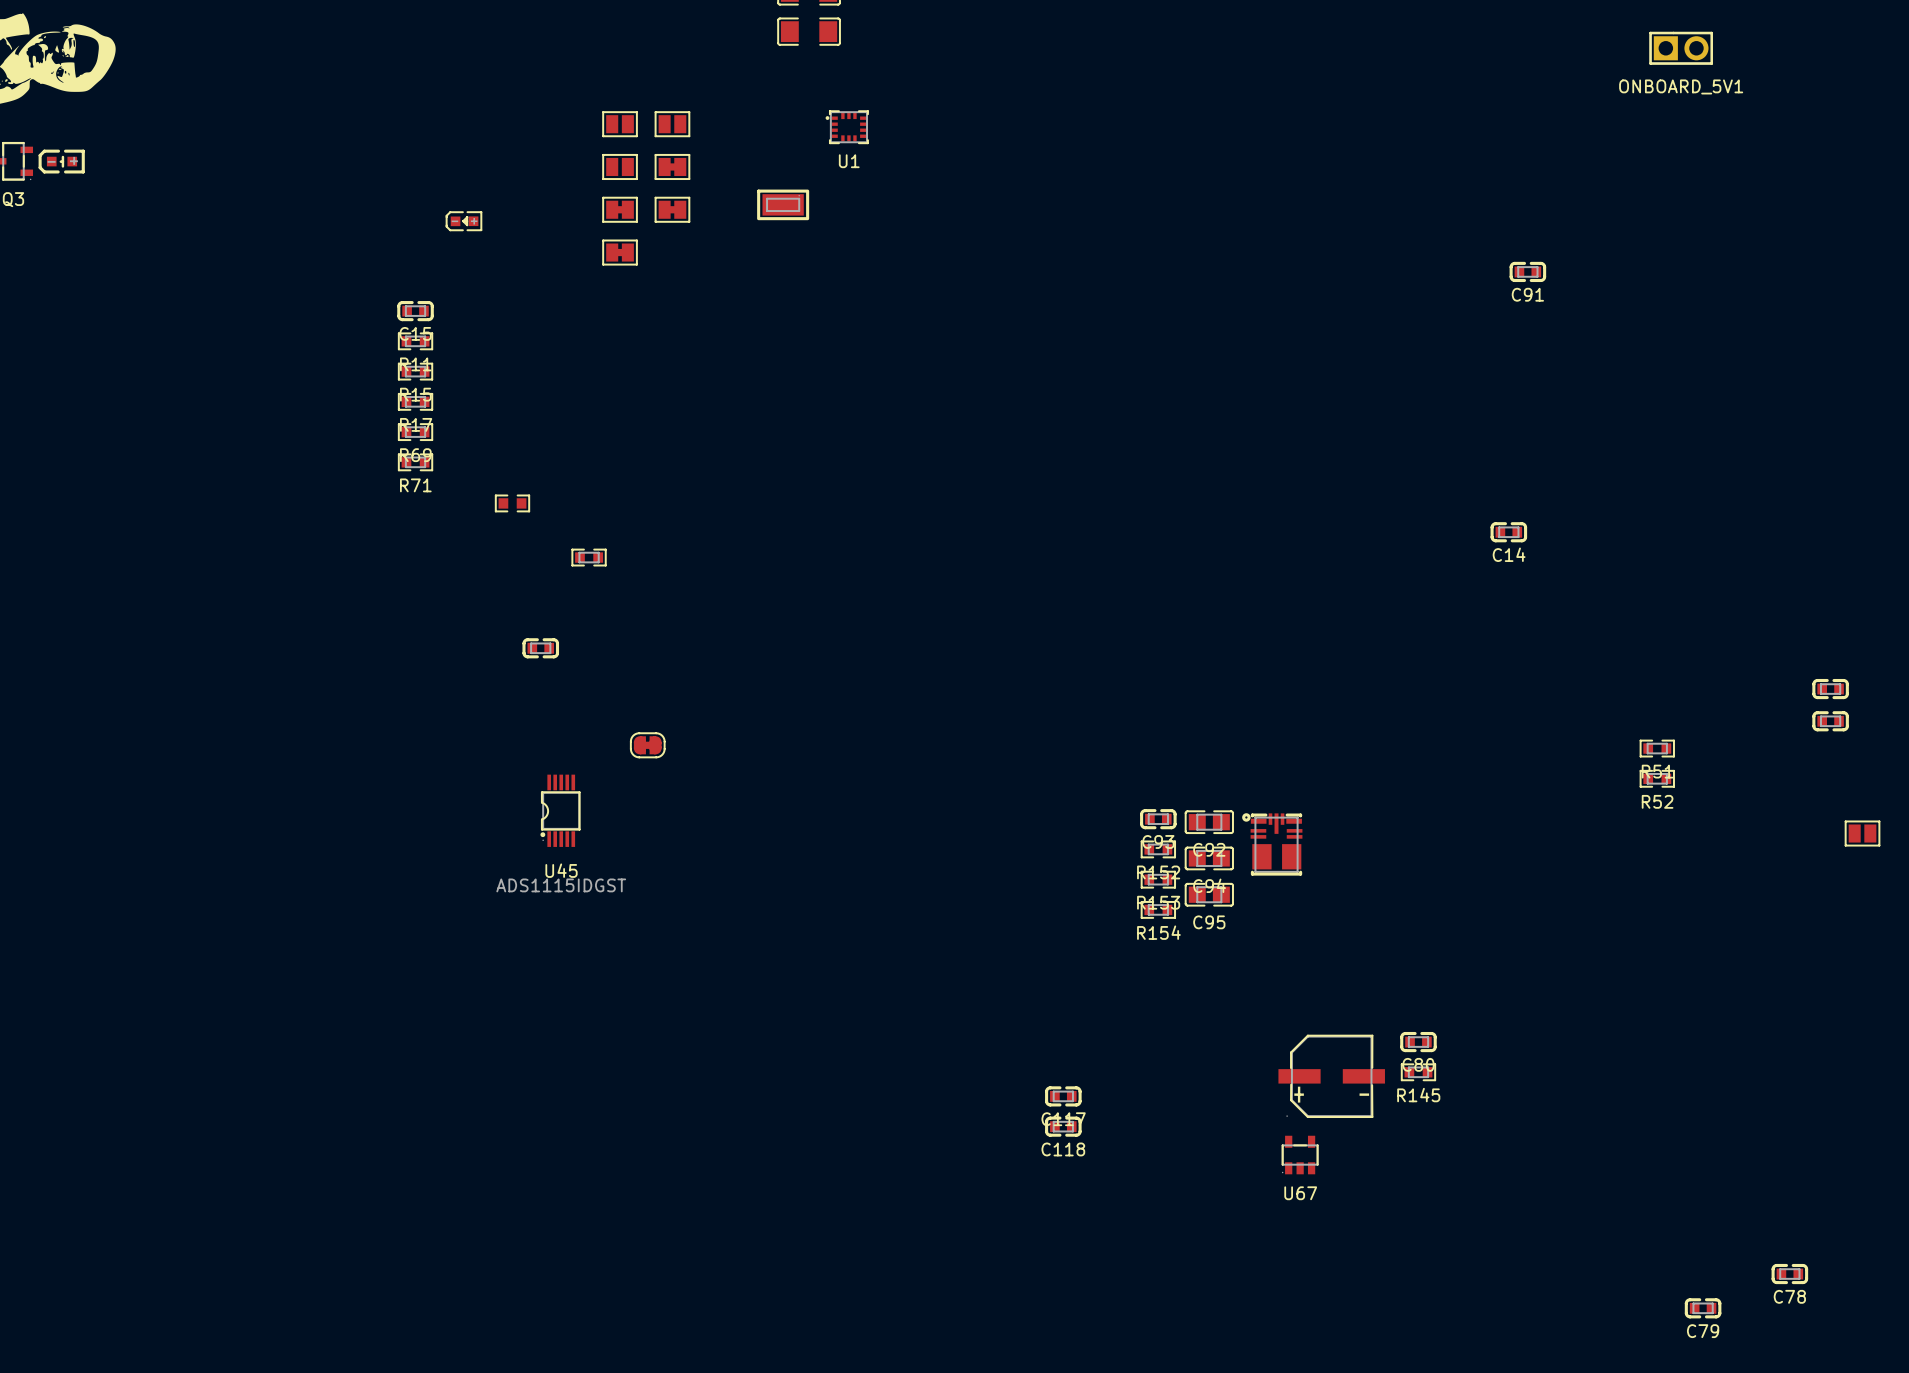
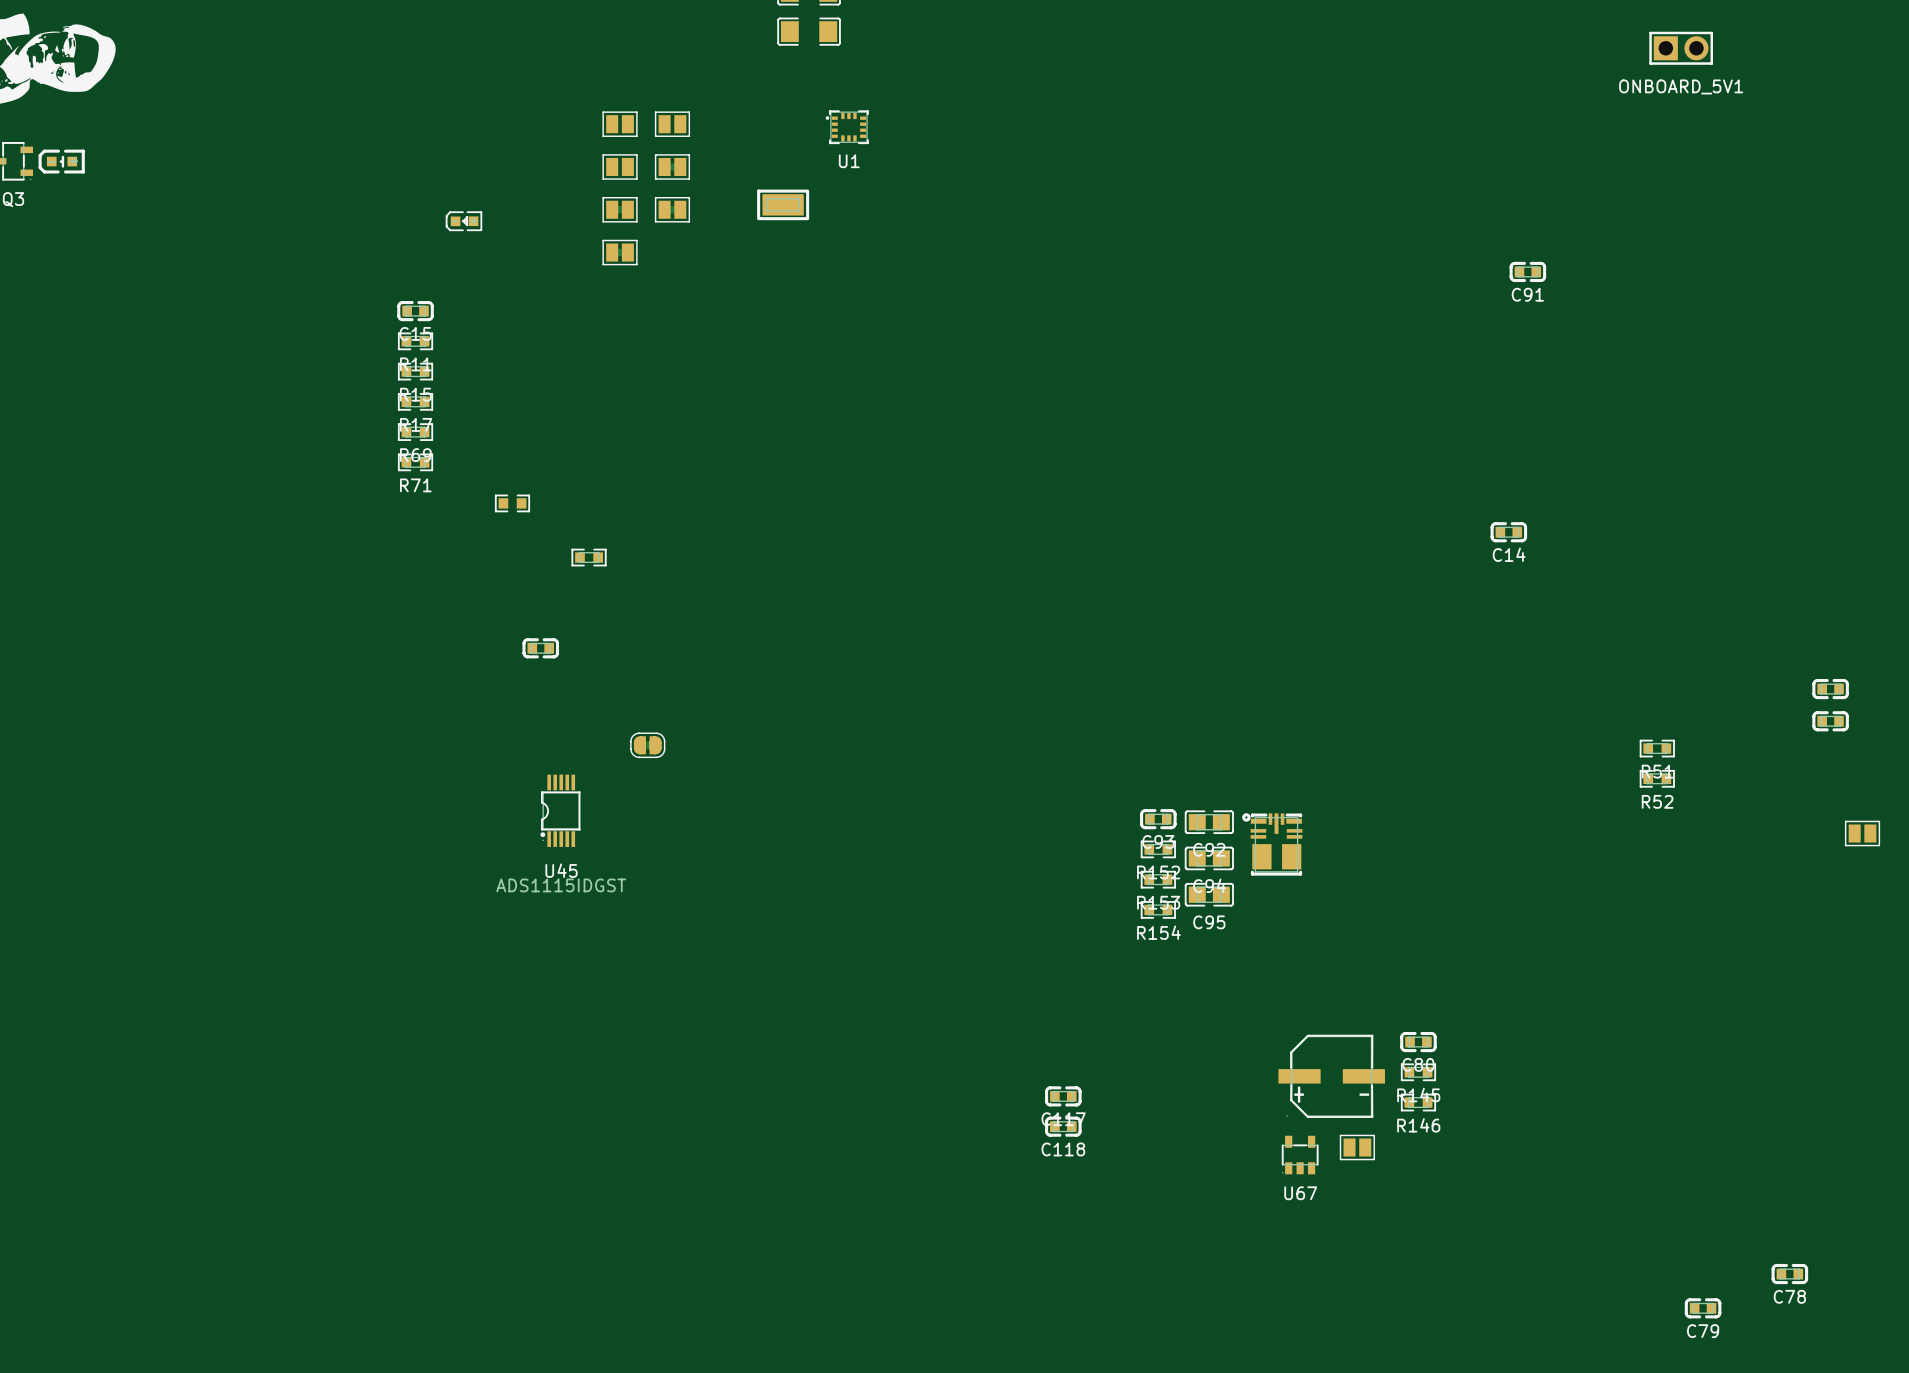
R146: none -> (1418, 1102)
part: none -> (1357, 1147)

